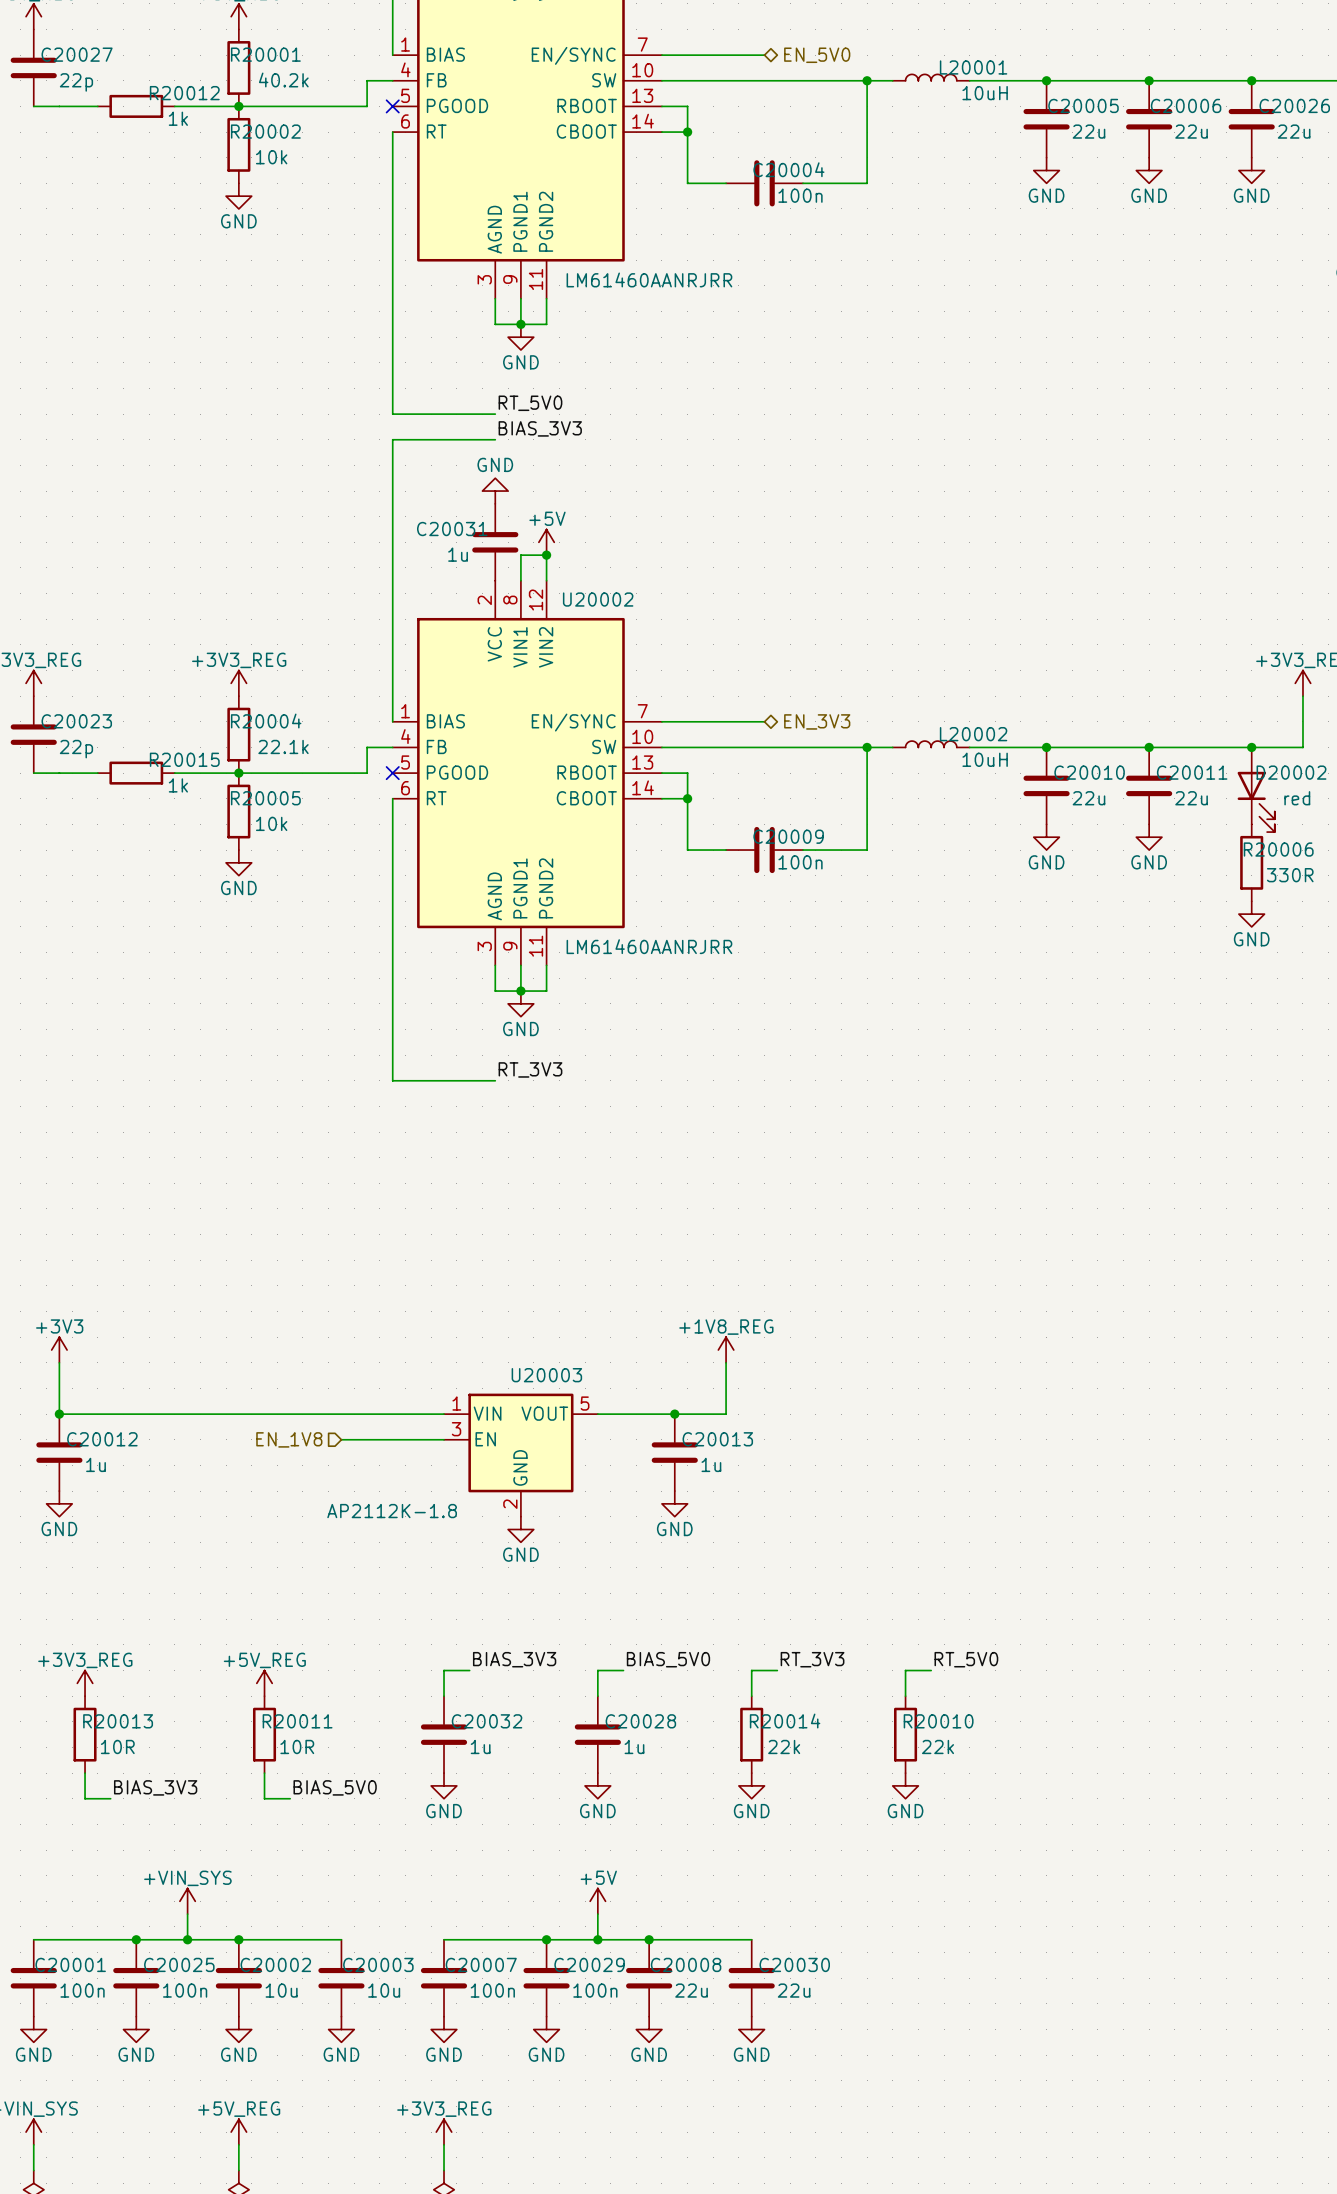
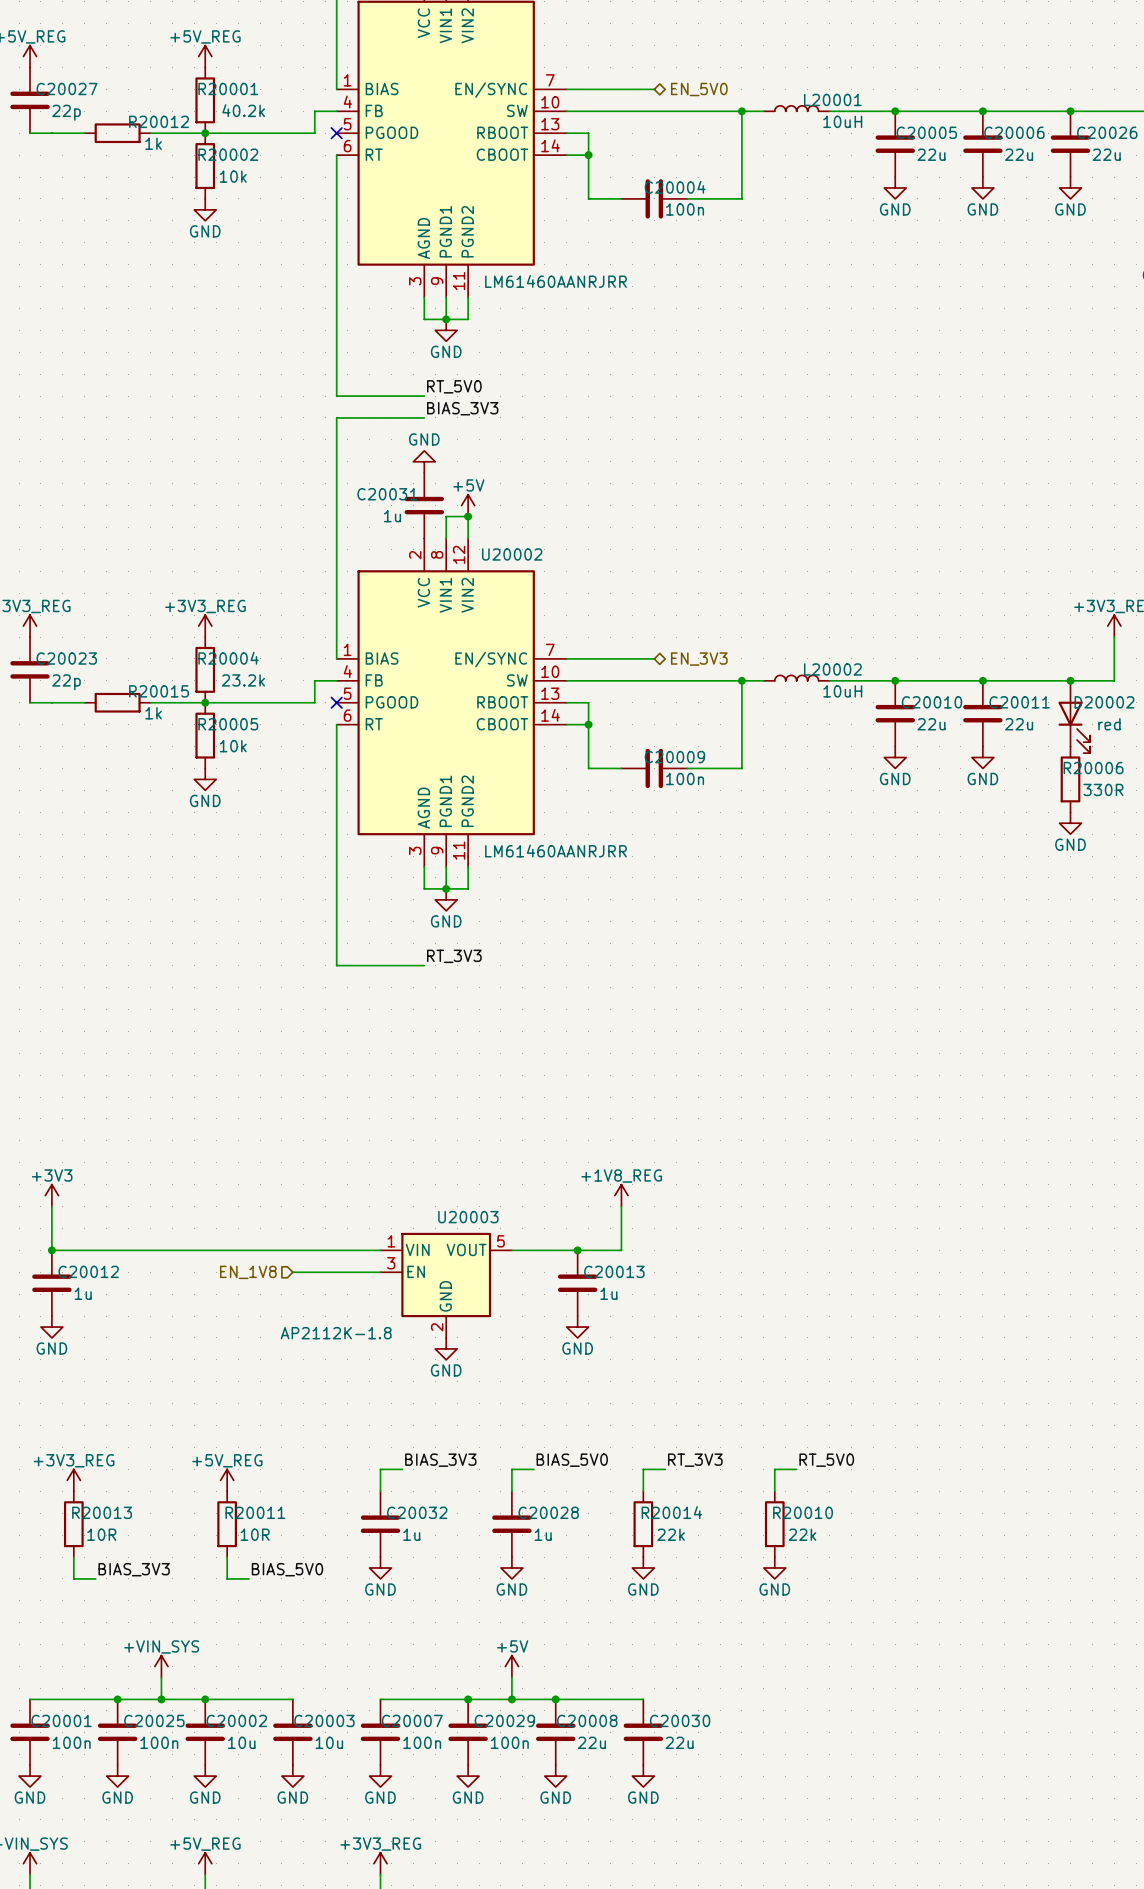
R20004 value: 22.1k (283, 746) -> 23.2k (243, 680)

